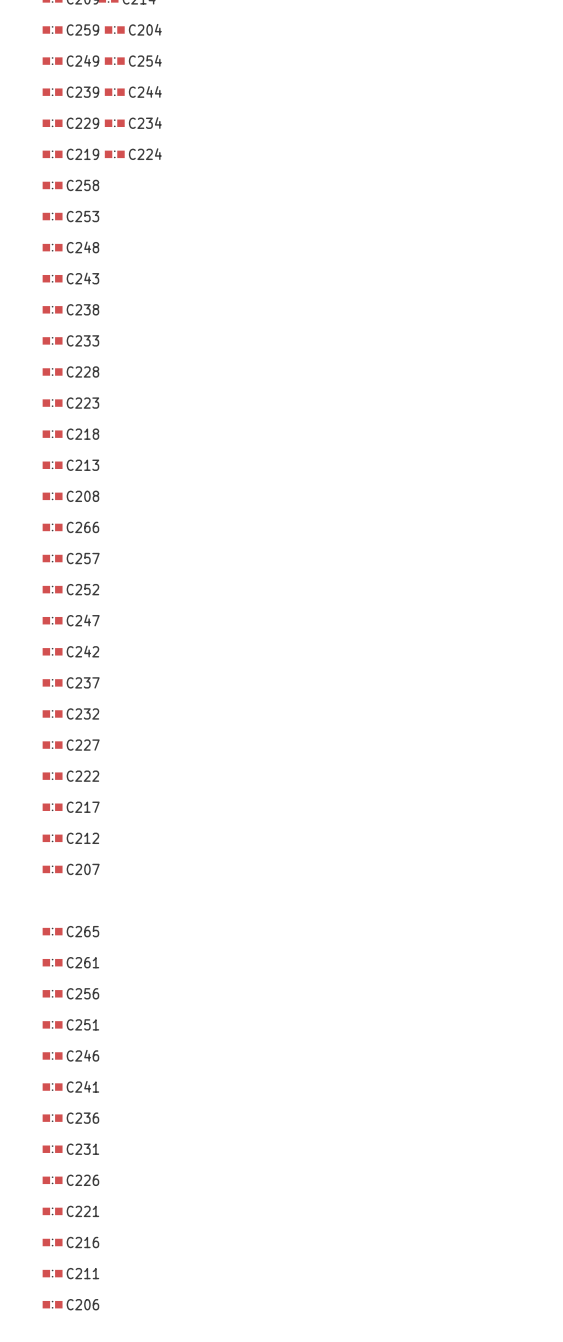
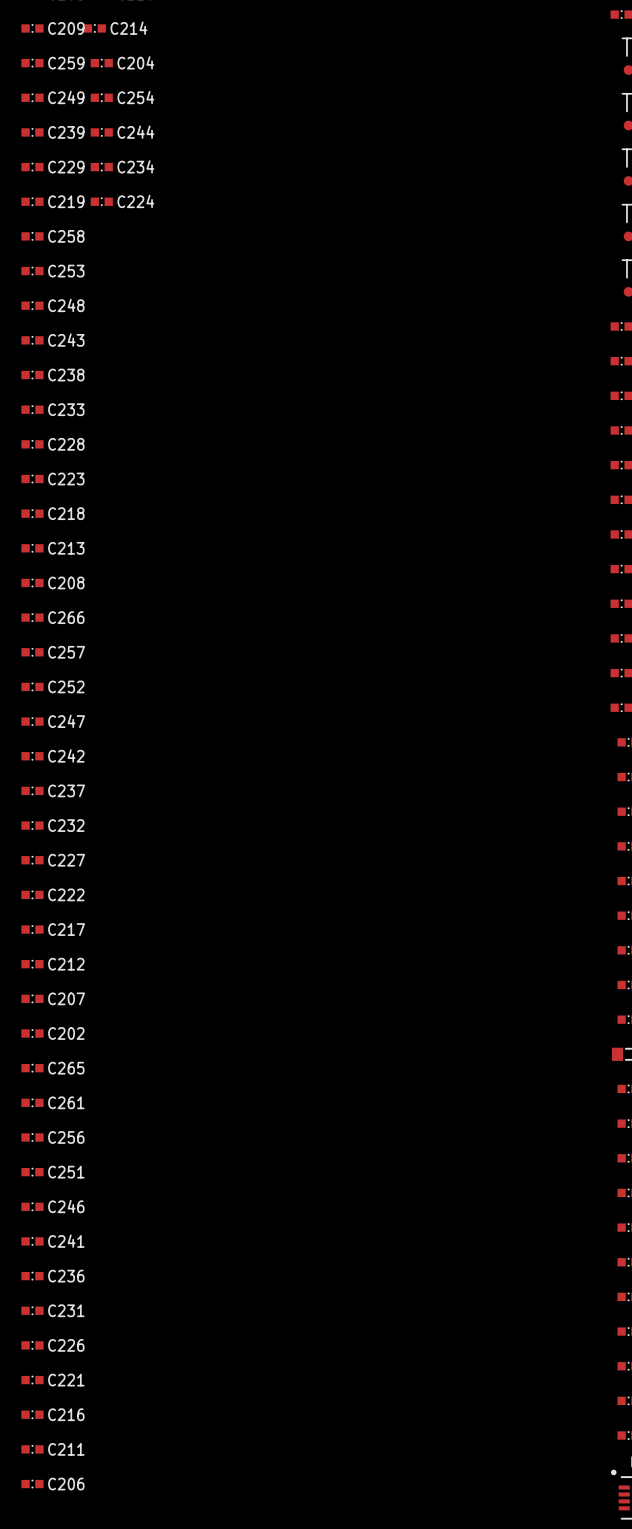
C202: none -> (32, 1033)

